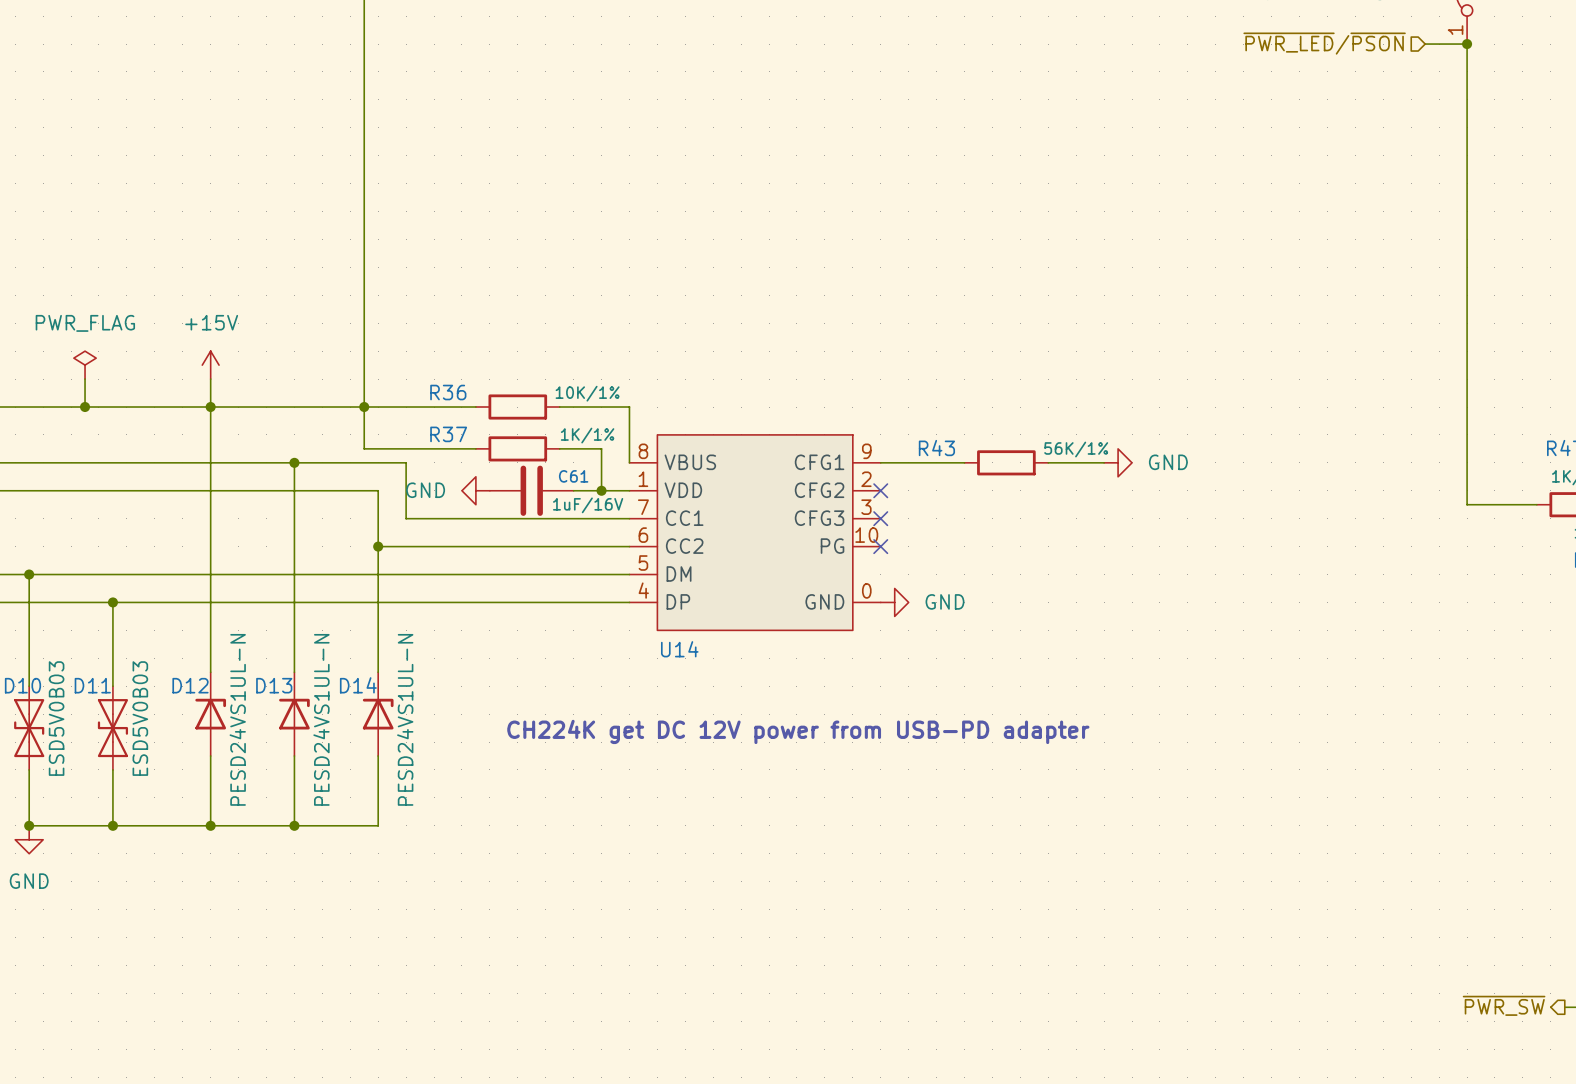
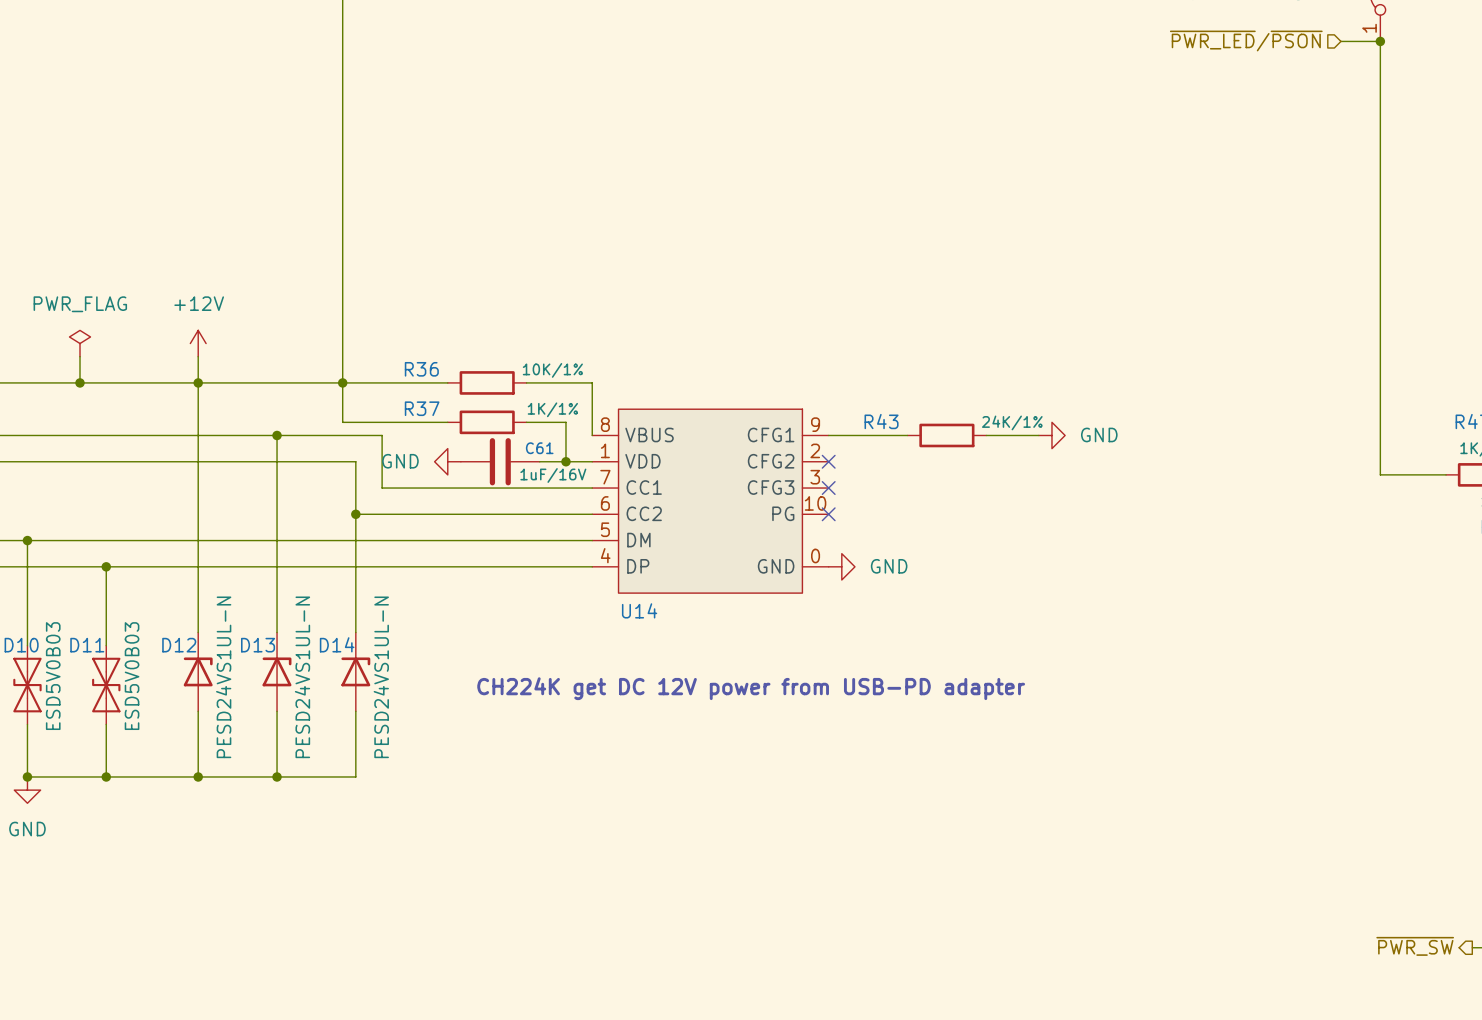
power symbol: +15V (210, 365) -> +12V (198, 343)
R43 value: 56K/1% (1076, 449) -> 24K/1% (1012, 422)

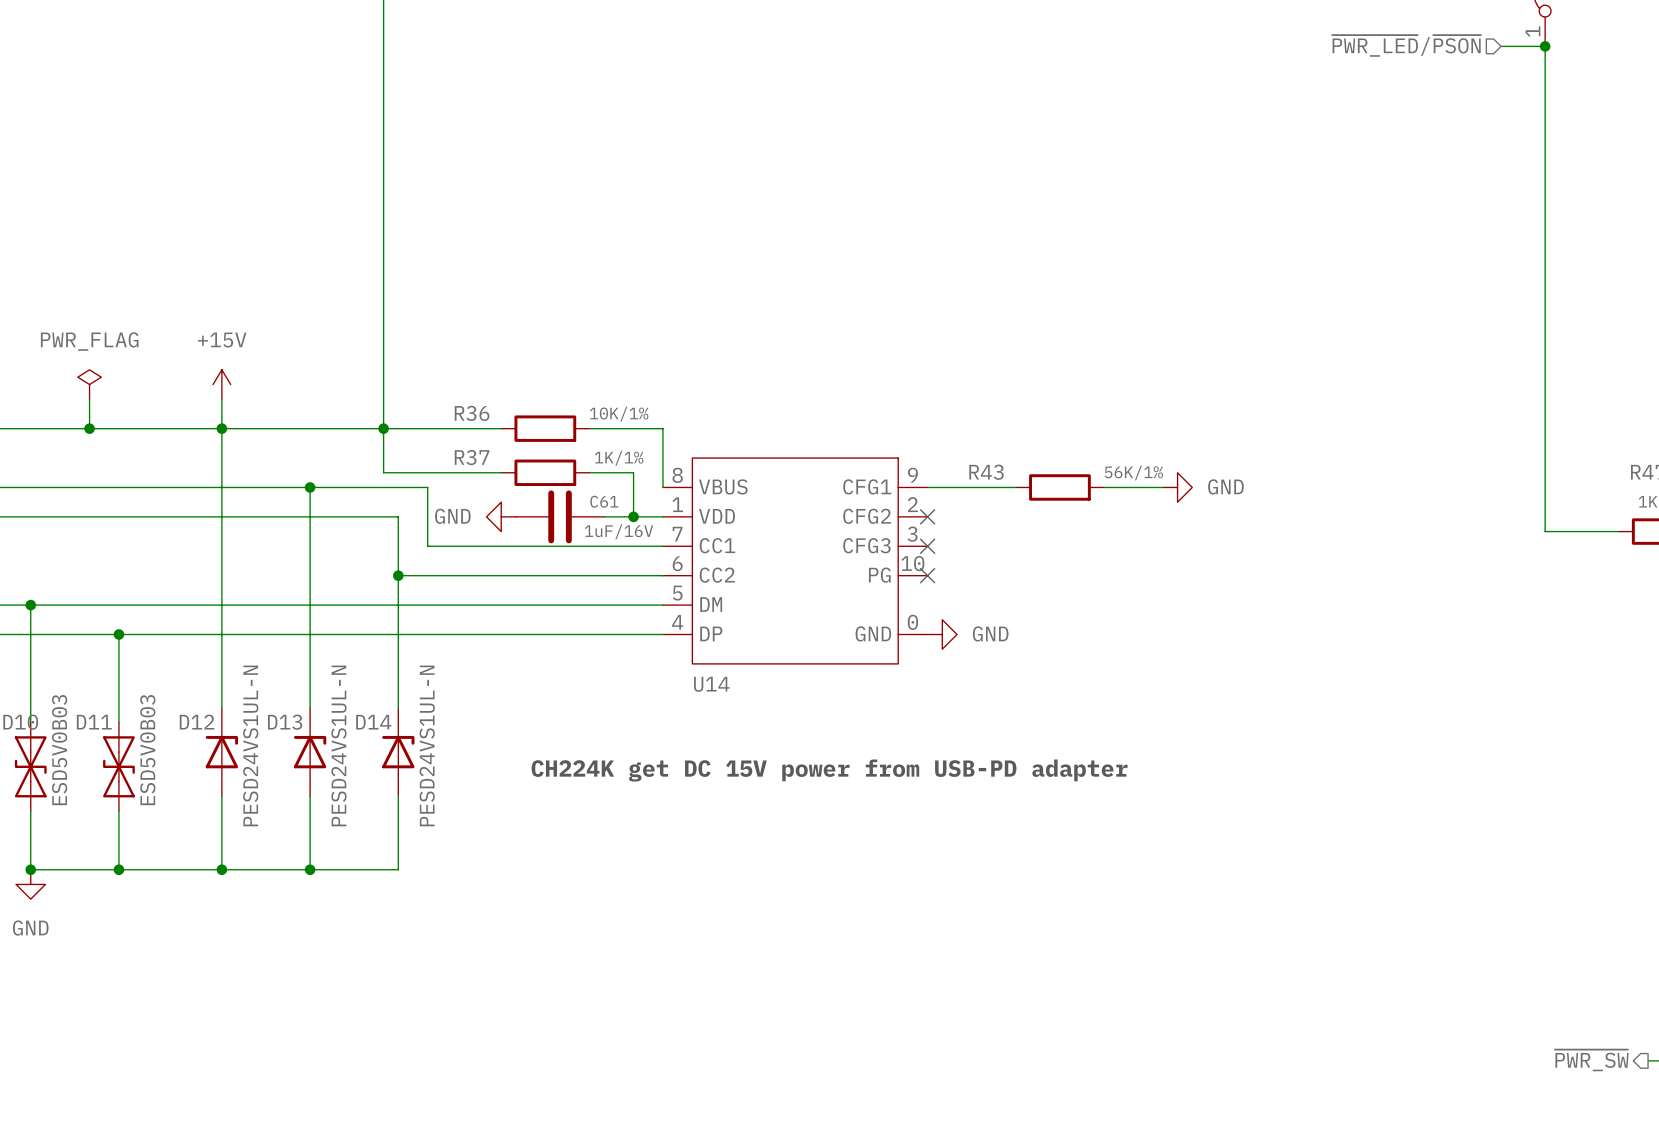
power symbol: +12V (198, 343) -> +15V (221, 384)
R43 value: 24K/1% (1012, 422) -> 56K/1% (1133, 472)
text: CH224K get DC 12V power from USB-PD adapter (751, 688) -> CH224K get DC 15V power from USB-PD adapter (829, 770)

